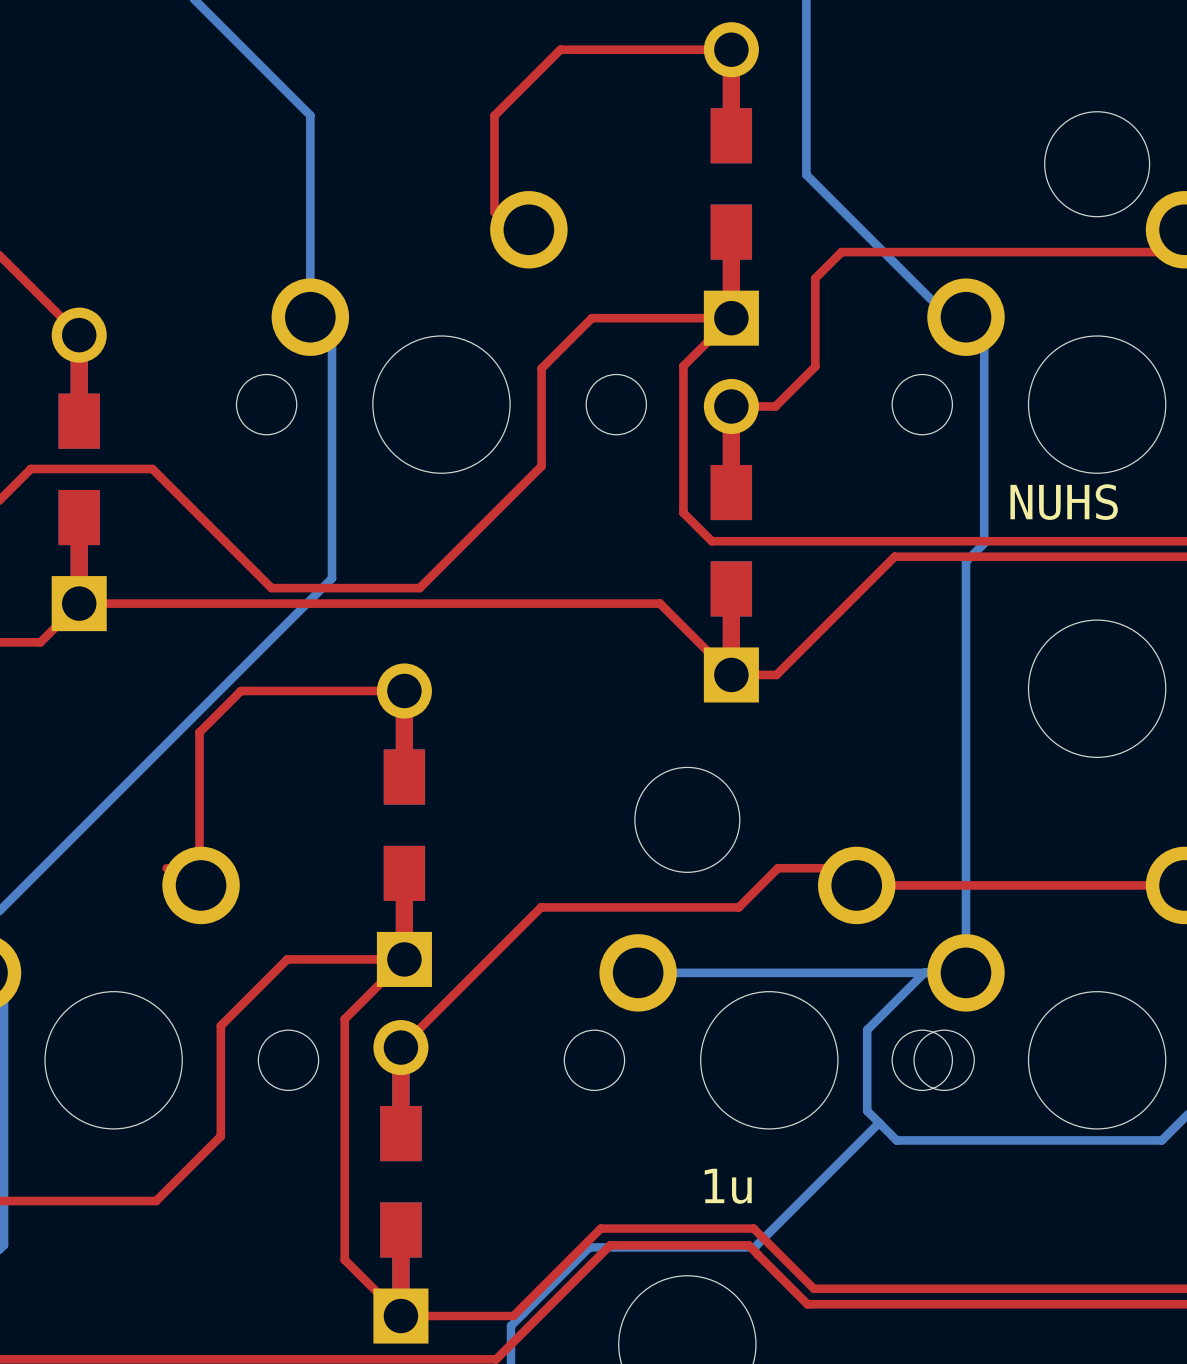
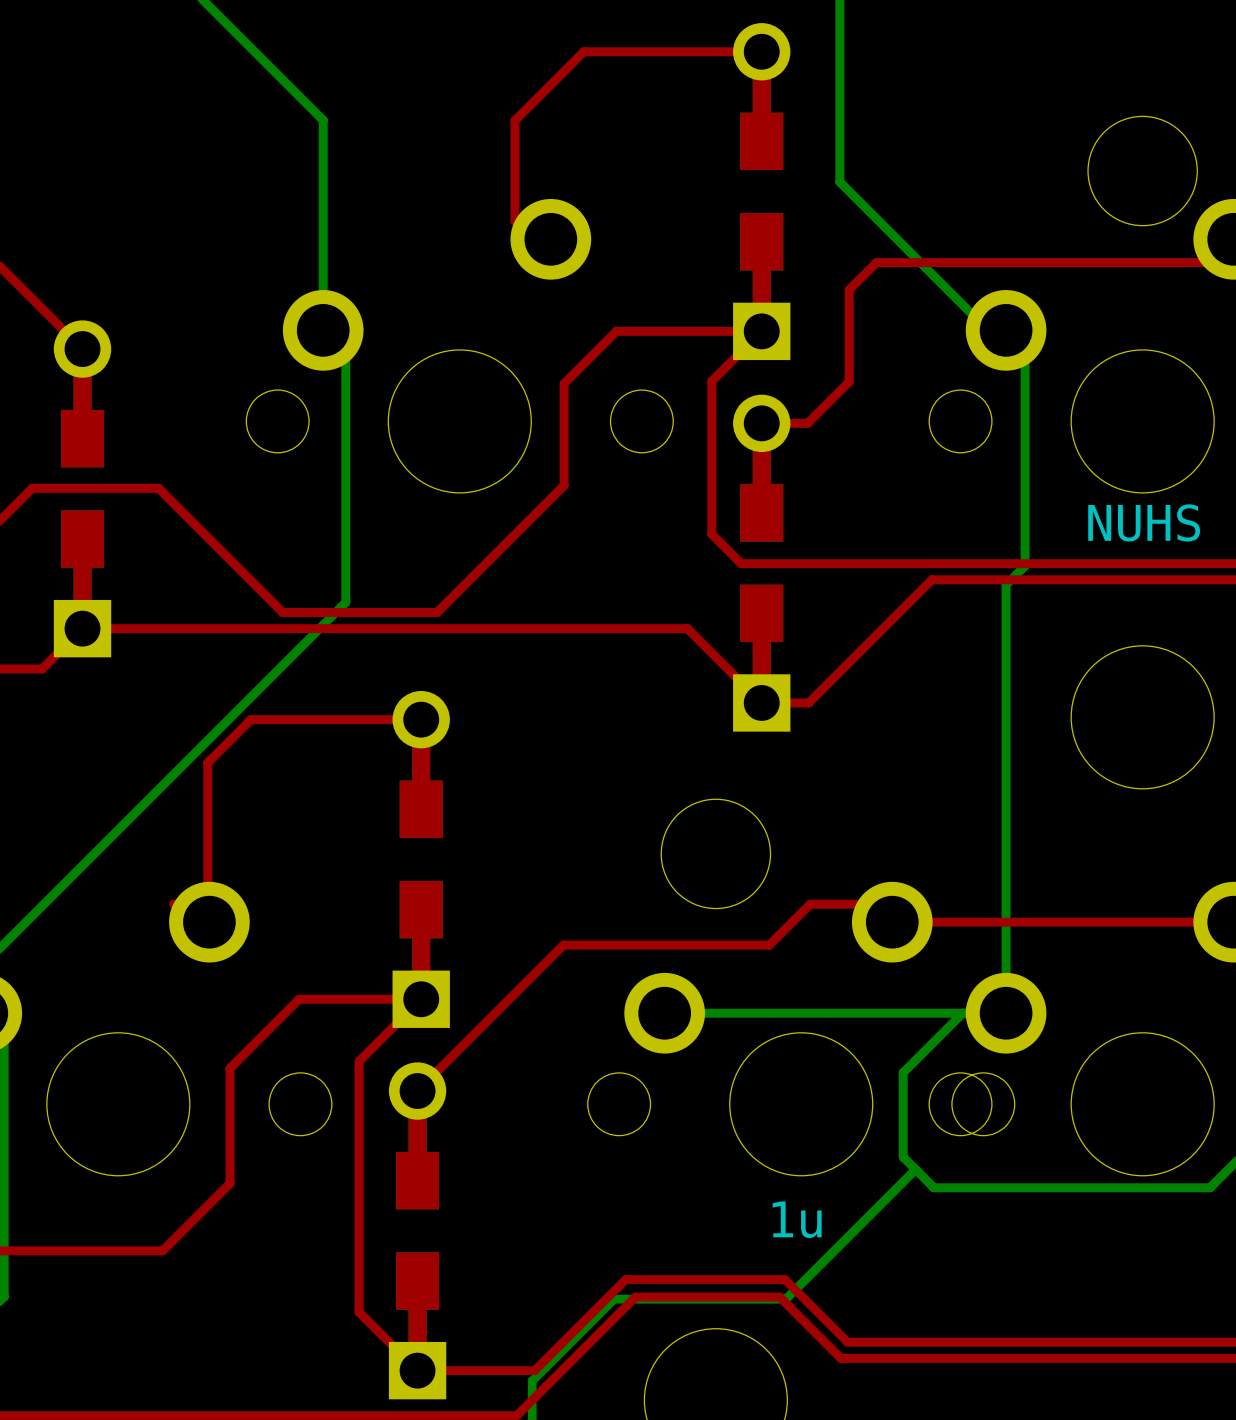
text position: NUHS (1064, 502) -> NUHS (1144, 522)
text position: 1u (728, 1186) -> 1u (797, 1219)

